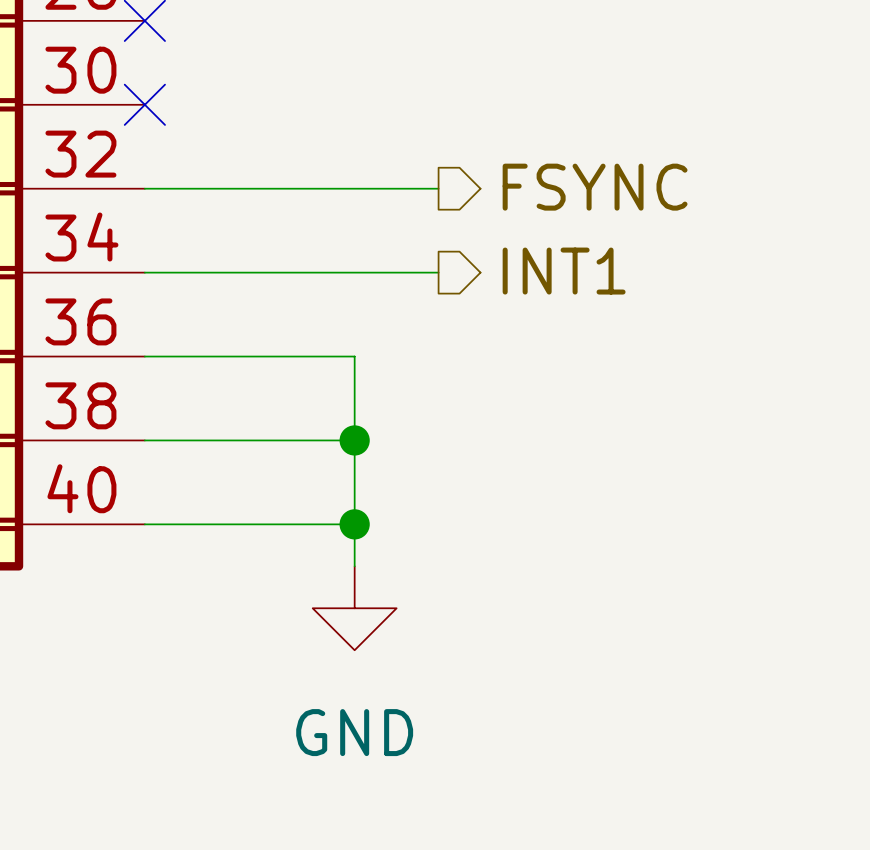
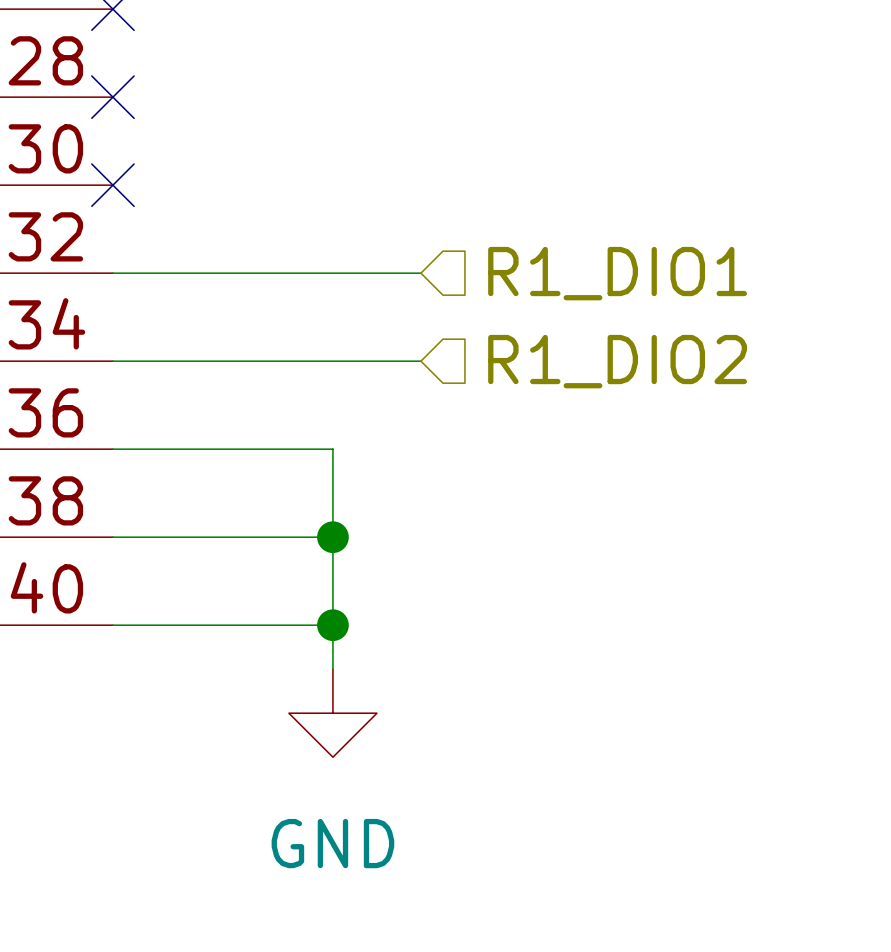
hierarchical label shape: output (595, 187) -> input (617, 273)
hierarchical label: FSYNC (595, 187) -> R1_DIO1 (617, 273)
hierarchical label shape: output (564, 271) -> input (617, 361)
hierarchical label: INT1 (564, 271) -> R1_DIO2 (617, 361)

